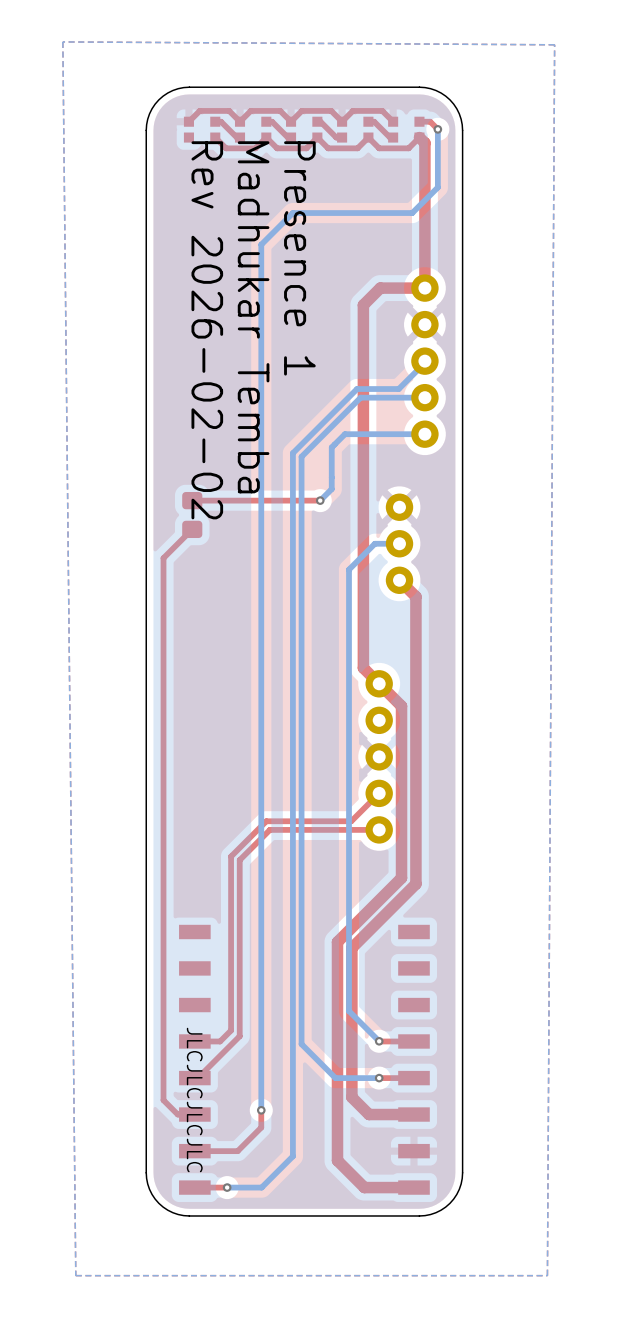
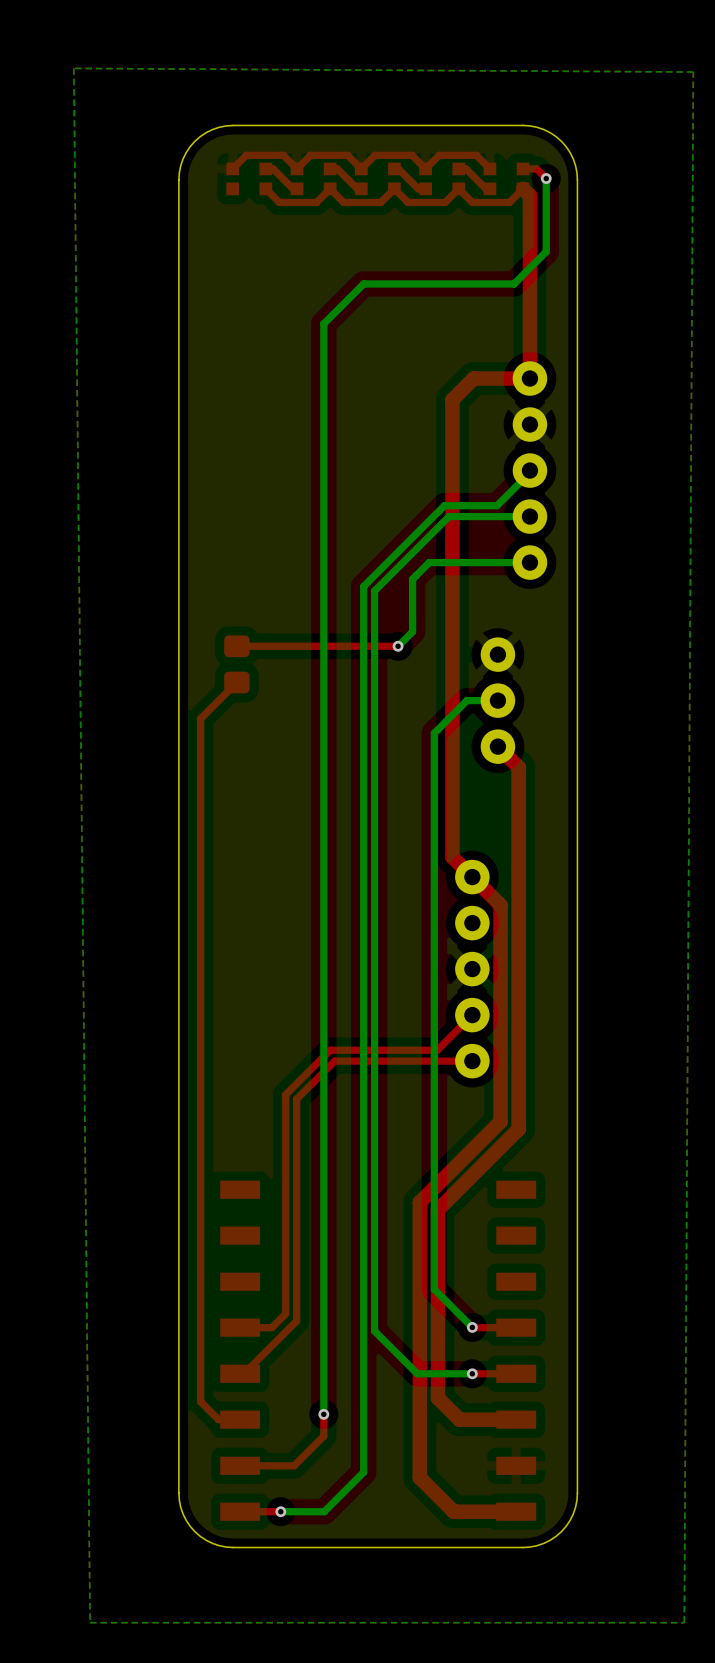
text: Presence 1 (299, 258) -> none
text: Madhukar Temba (253, 317) -> none
text: Rev 2026-02-02 (207, 330) -> none
text: JLCJLCJLCJLC (194, 1100) -> none

